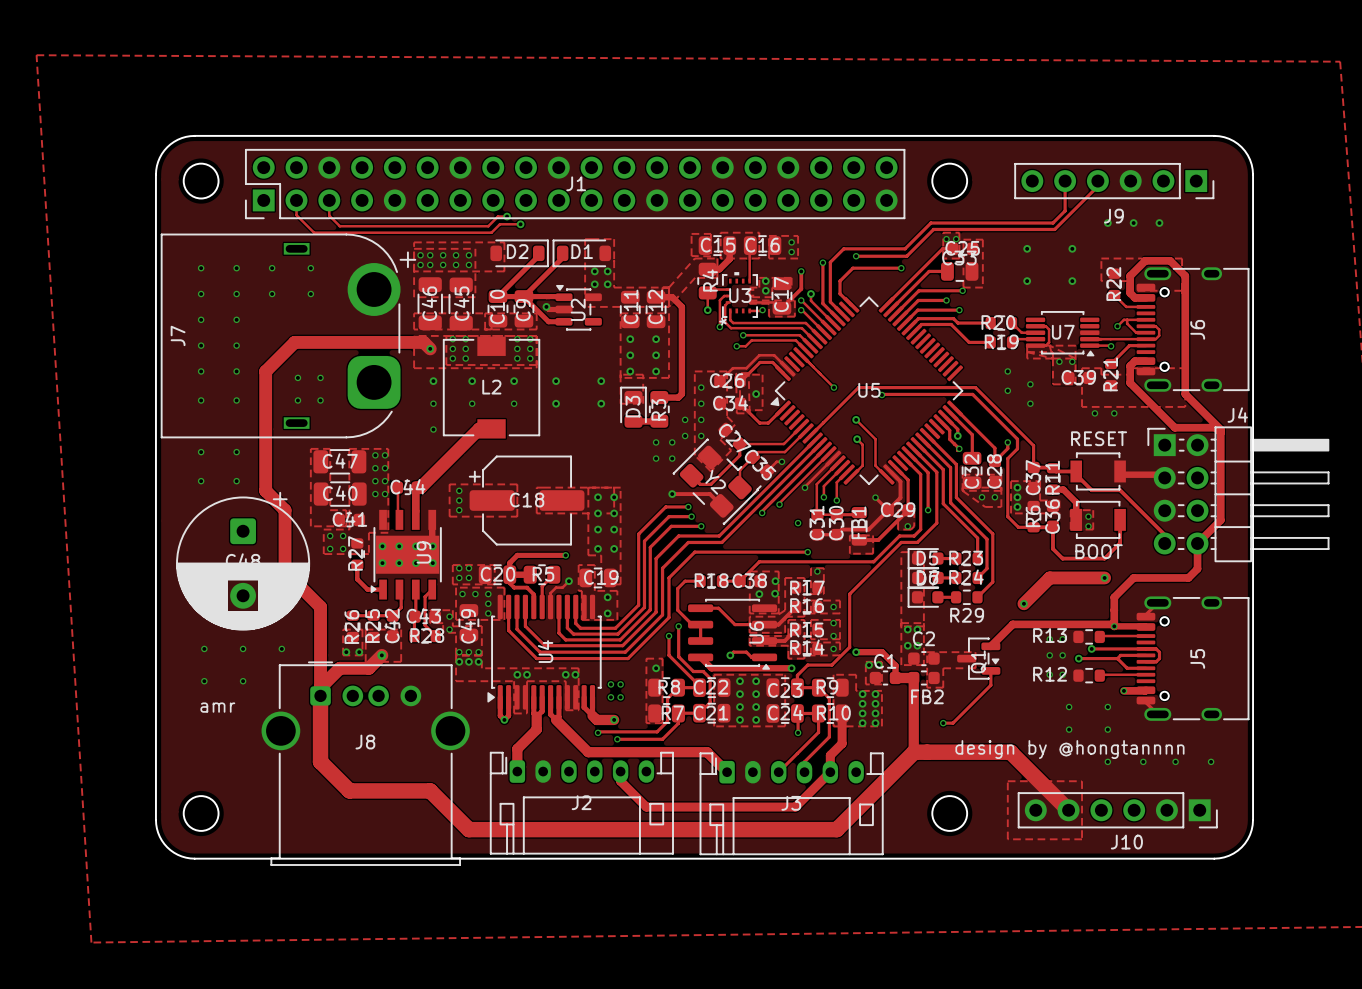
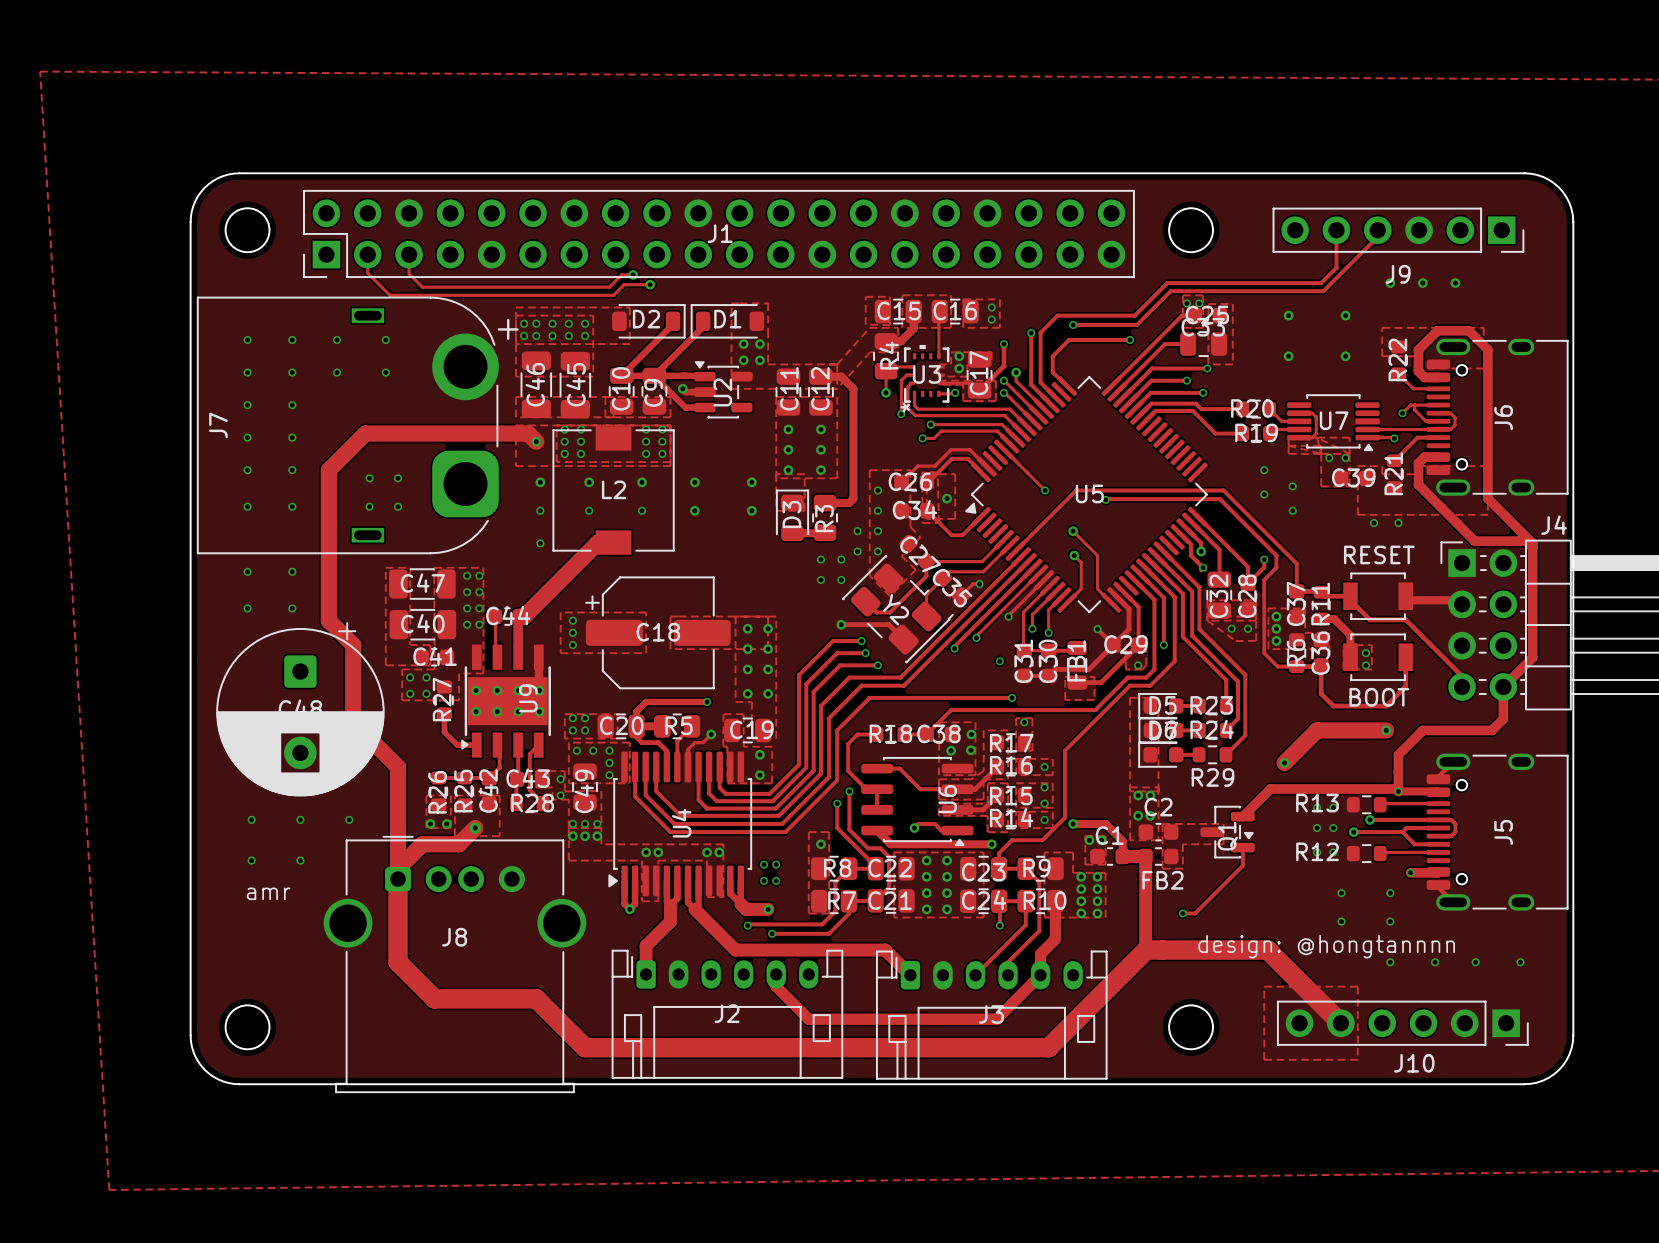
text: design by @hongtannnn (1069, 749) -> design: @hongtannnn (1326, 946)

